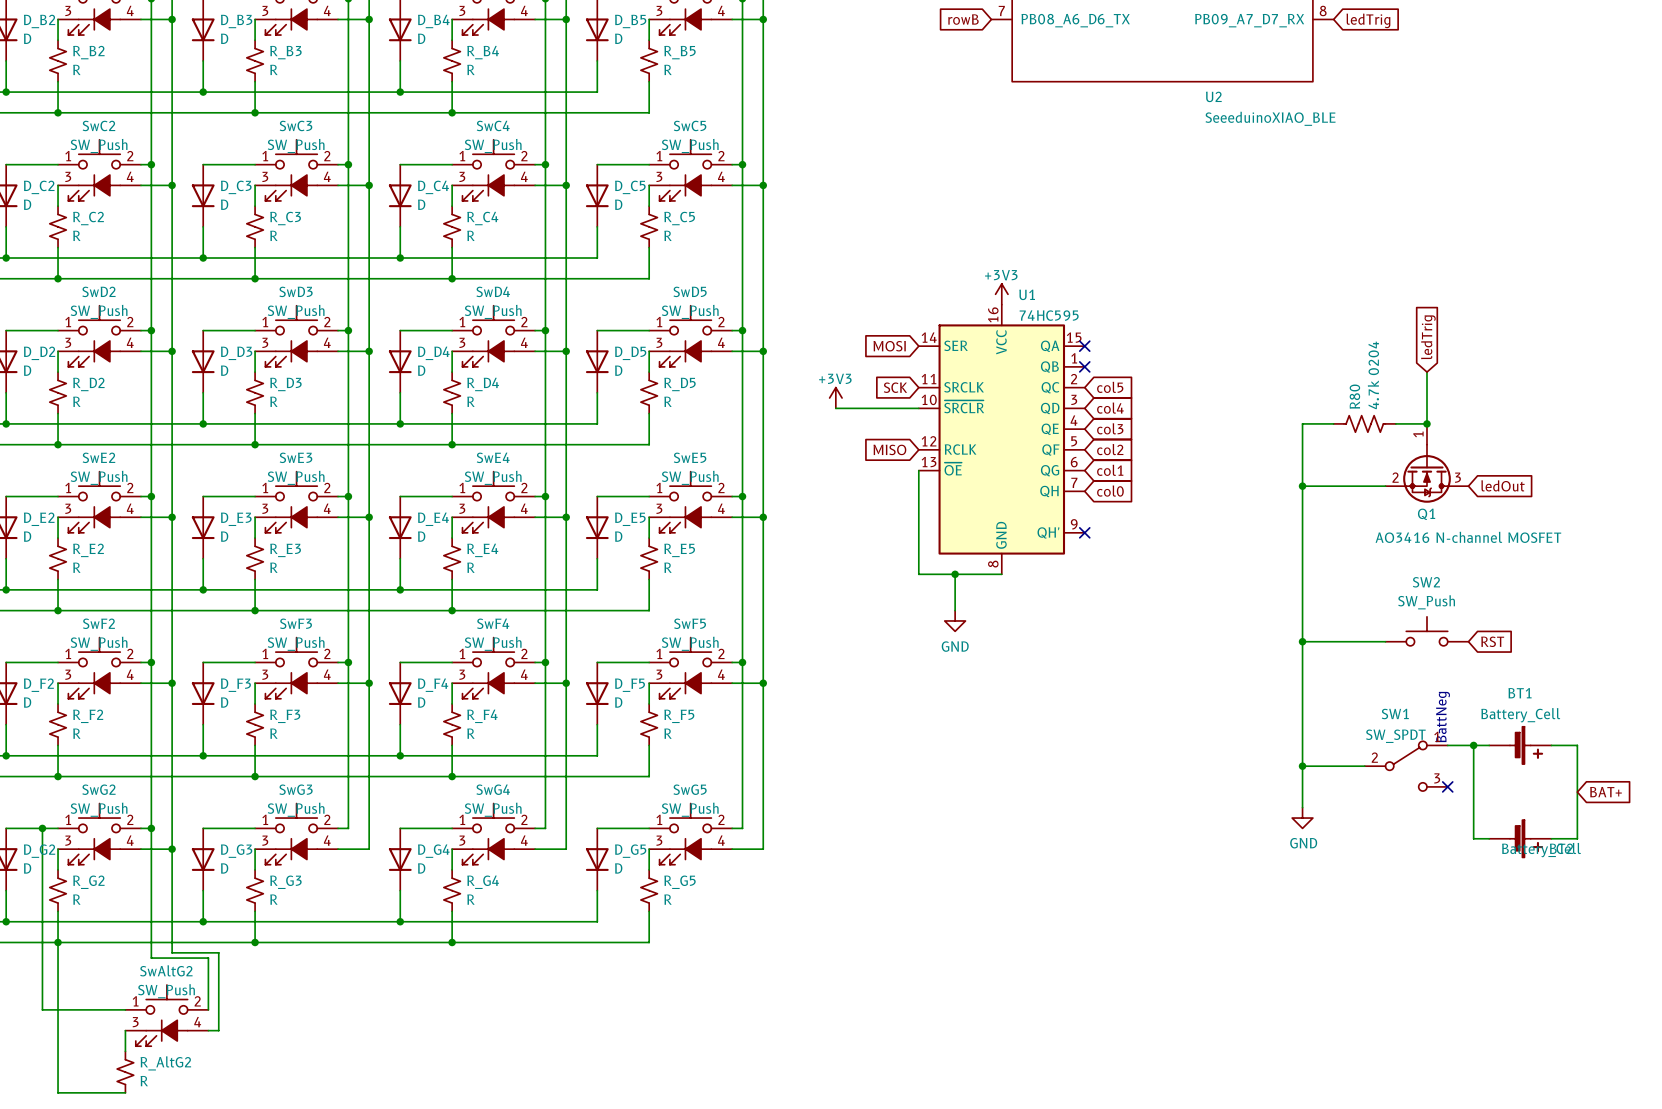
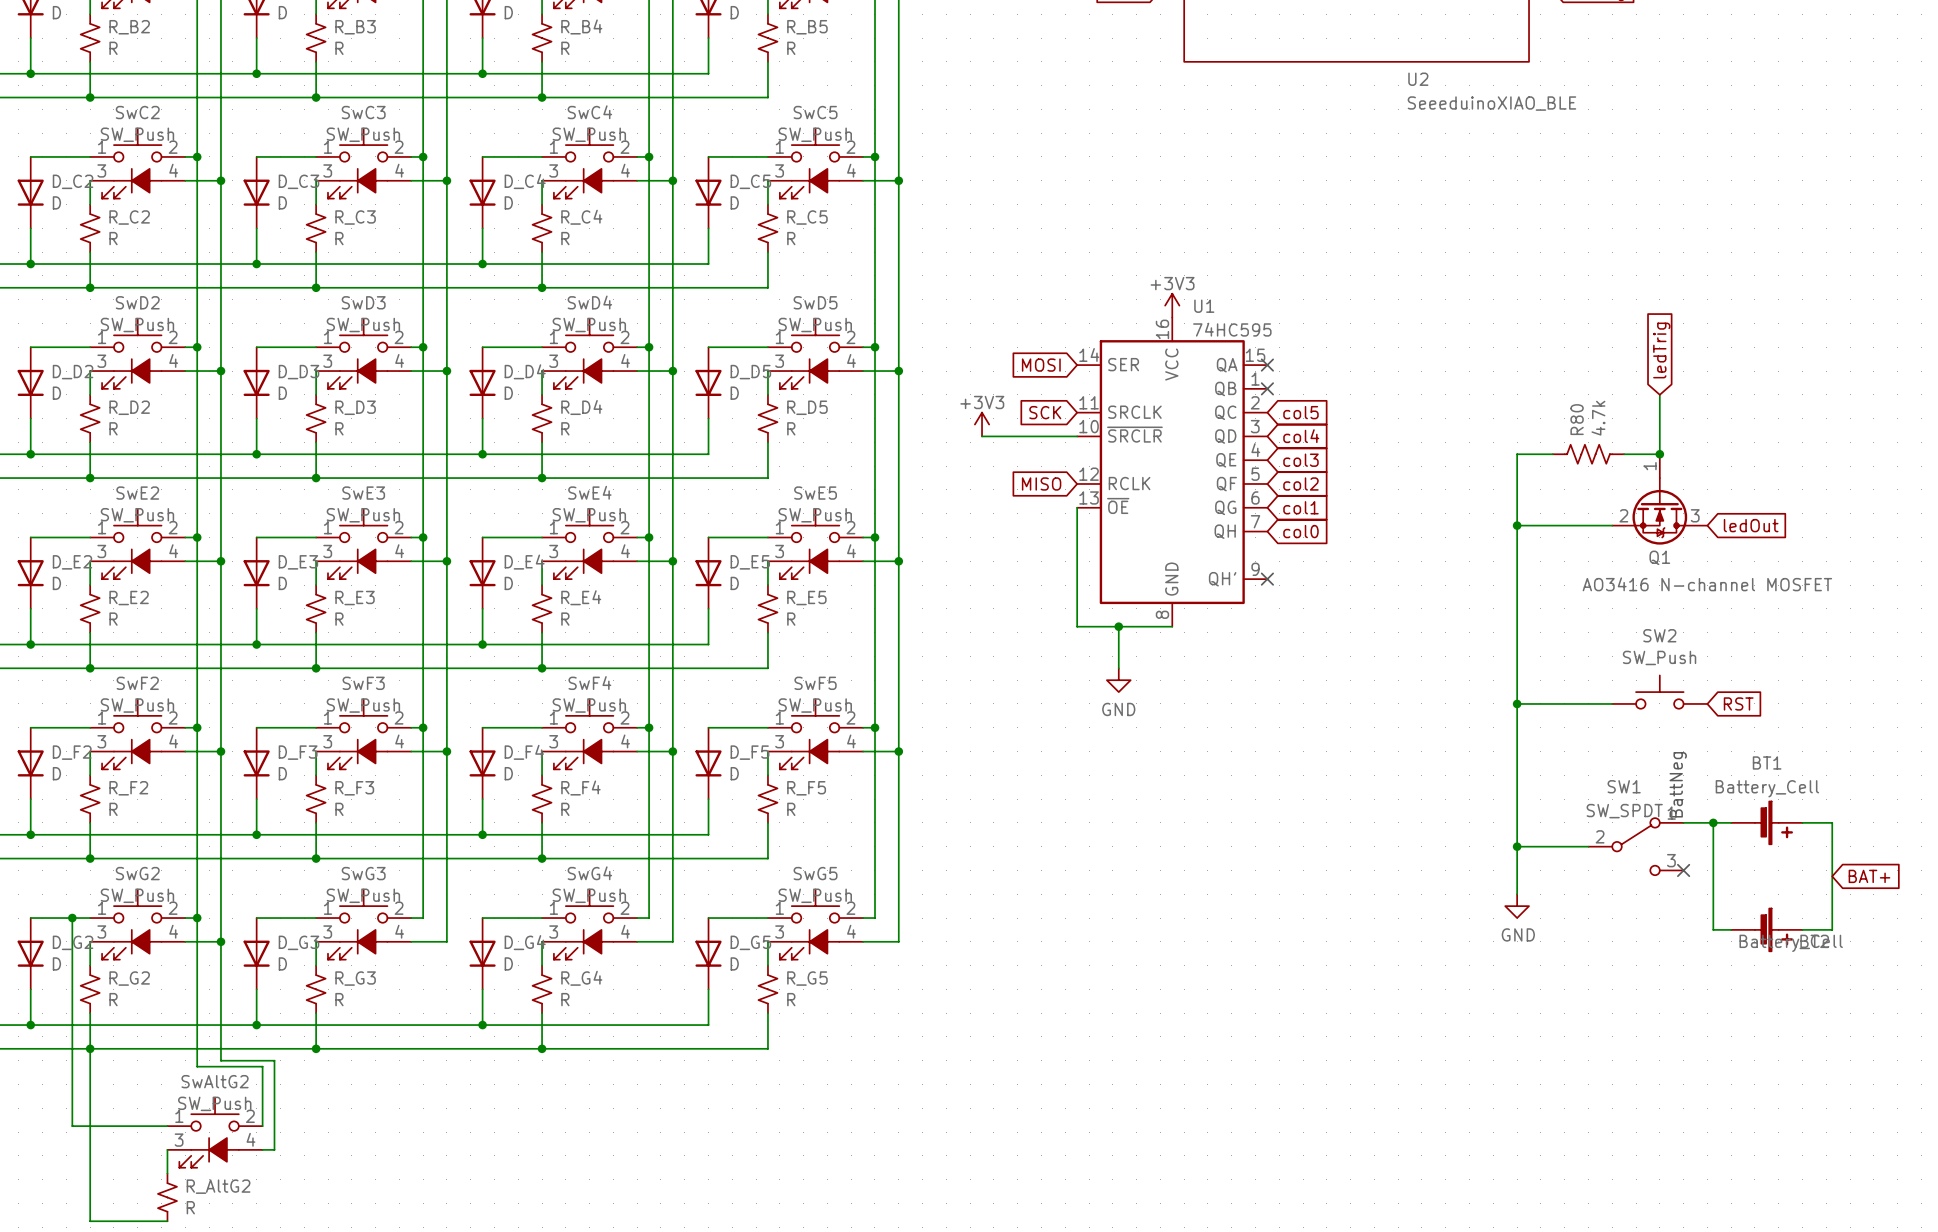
R80 value: 4.7k 0204 (1373, 375) -> 4.7k (1598, 418)

